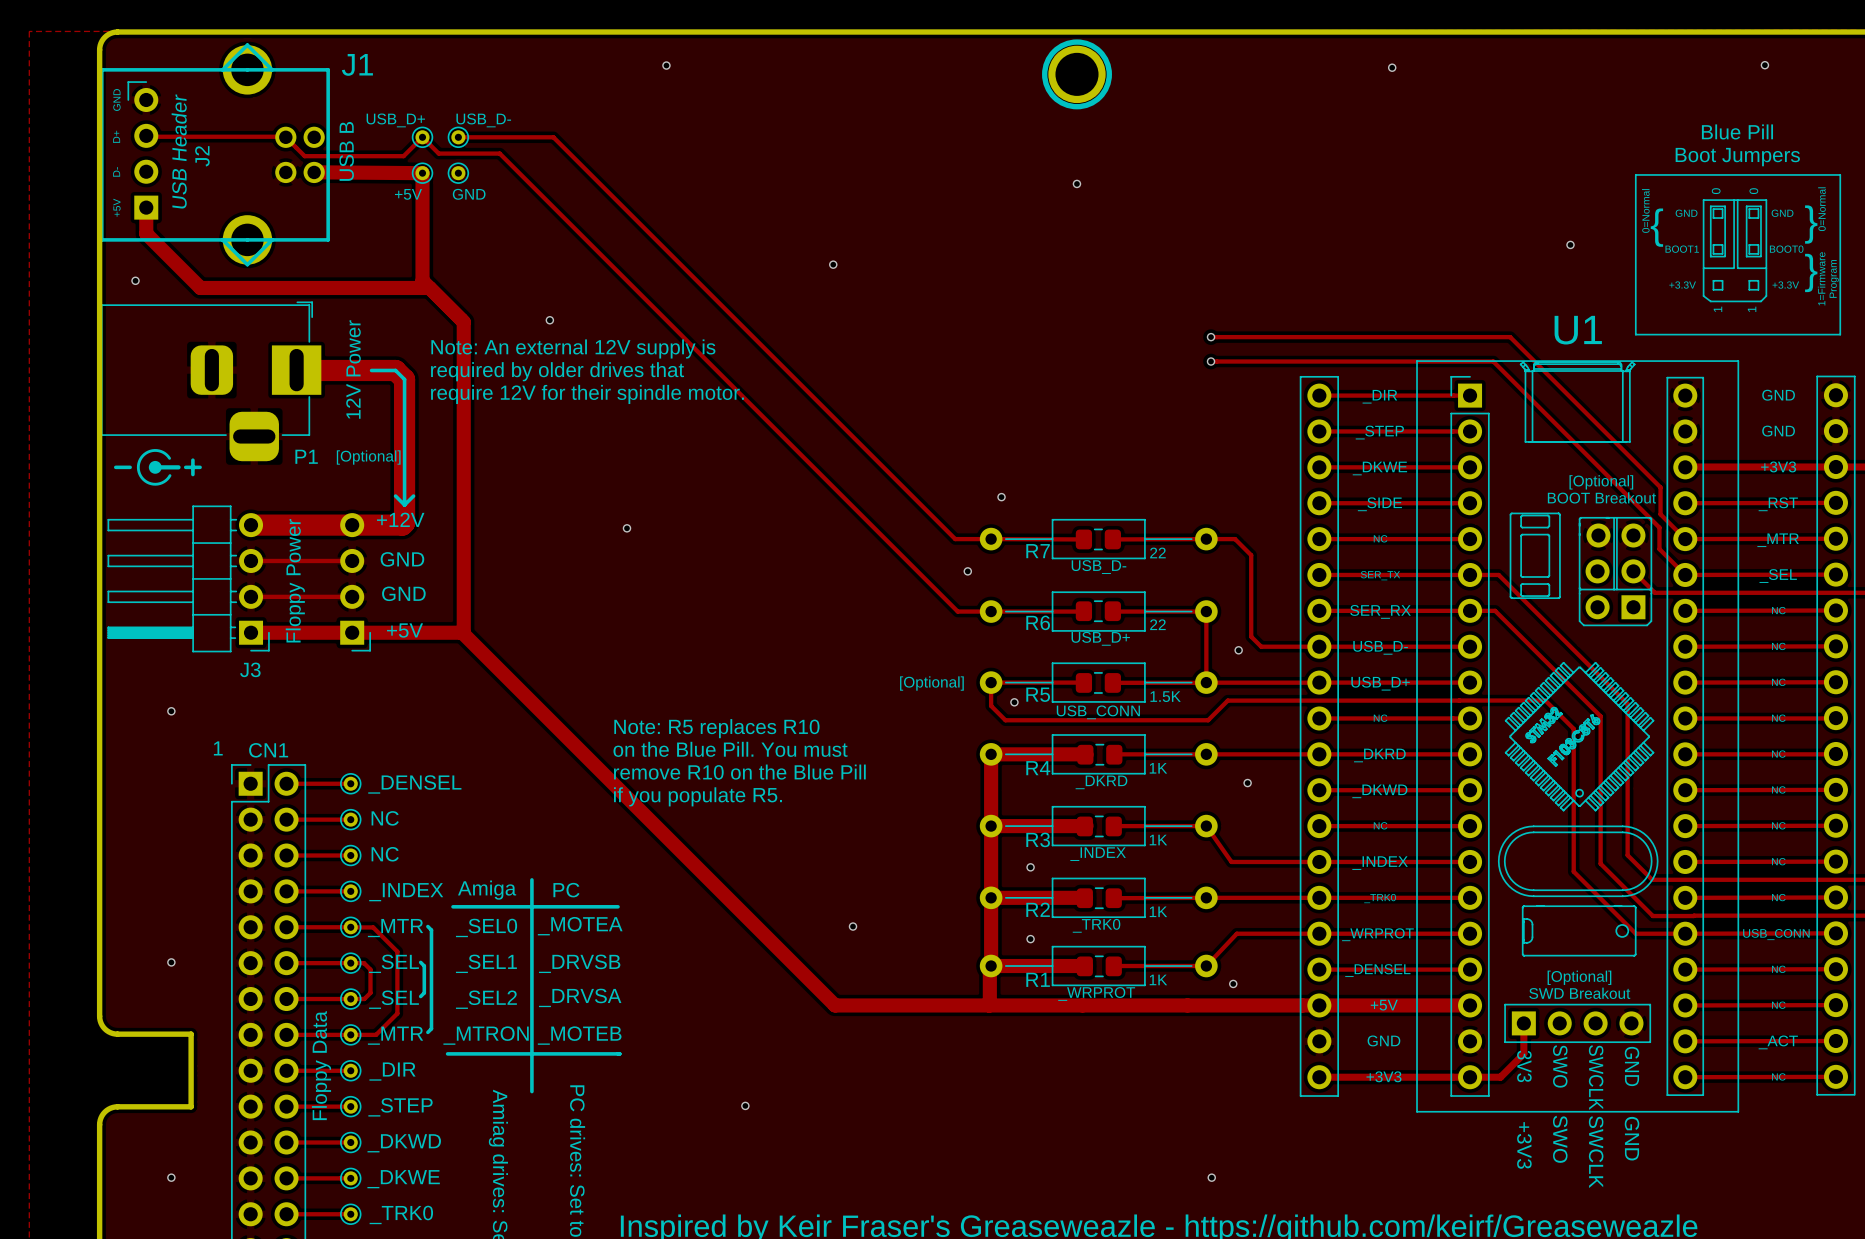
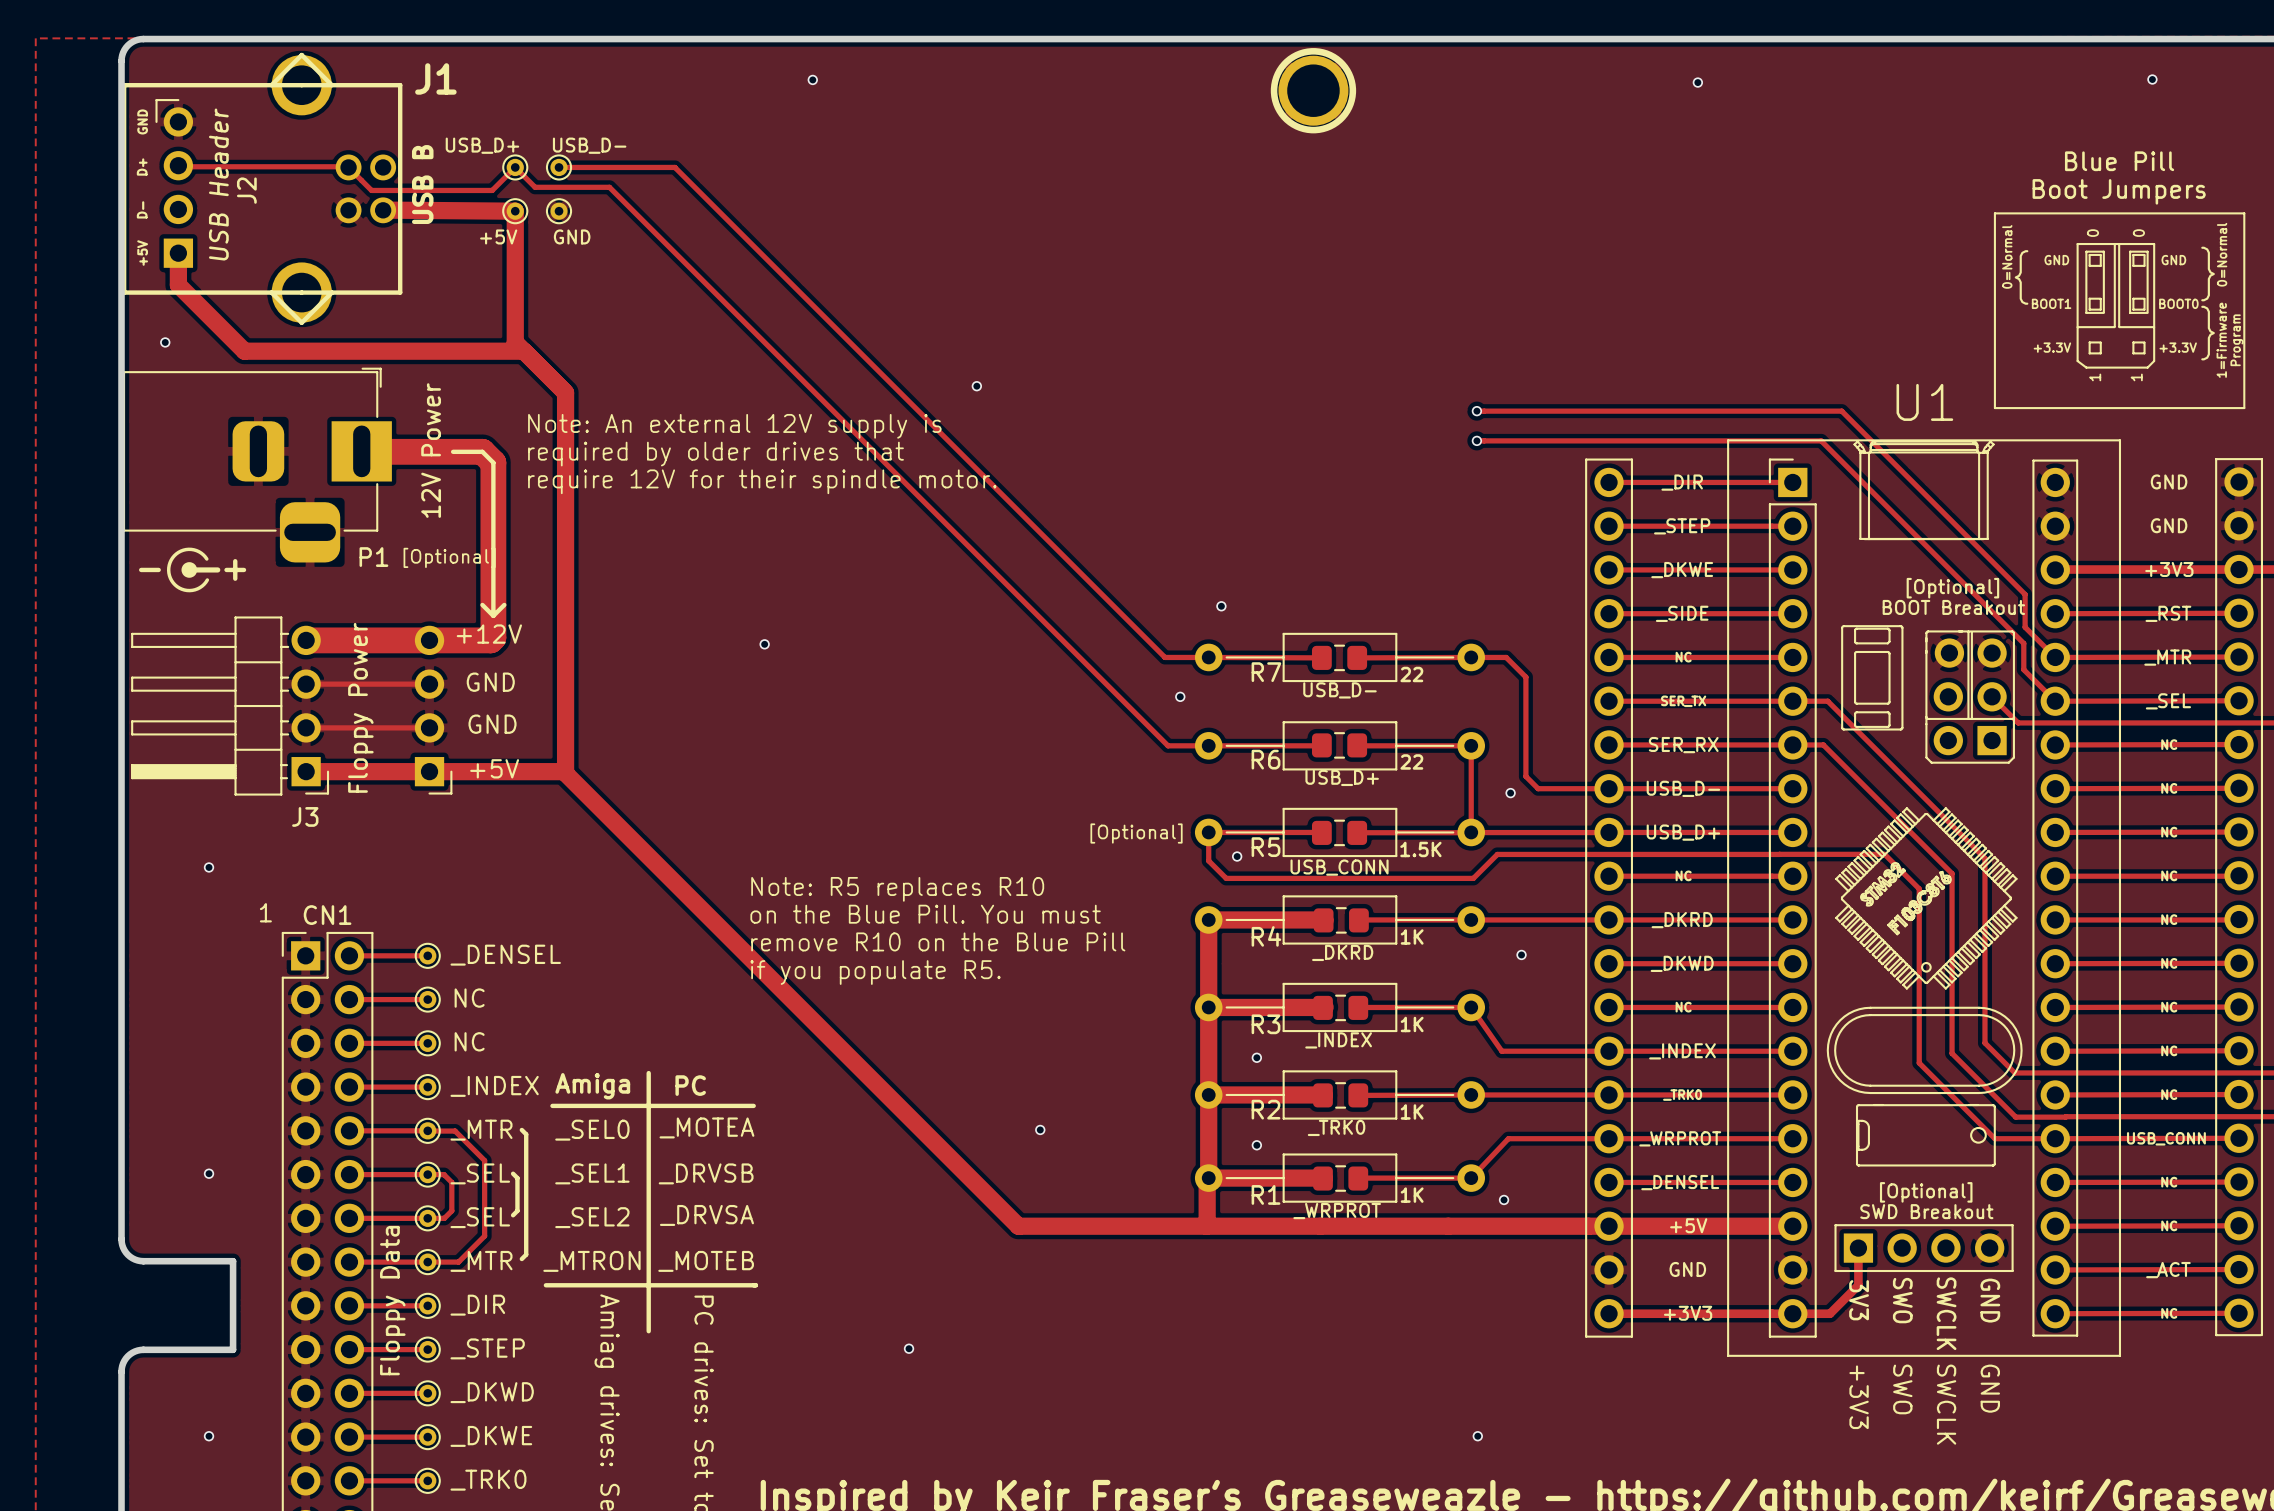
via: (1076, 183) -> none
via: (1570, 244) -> none
via position: (833, 264) -> (976, 386)
via: (549, 320) -> none

